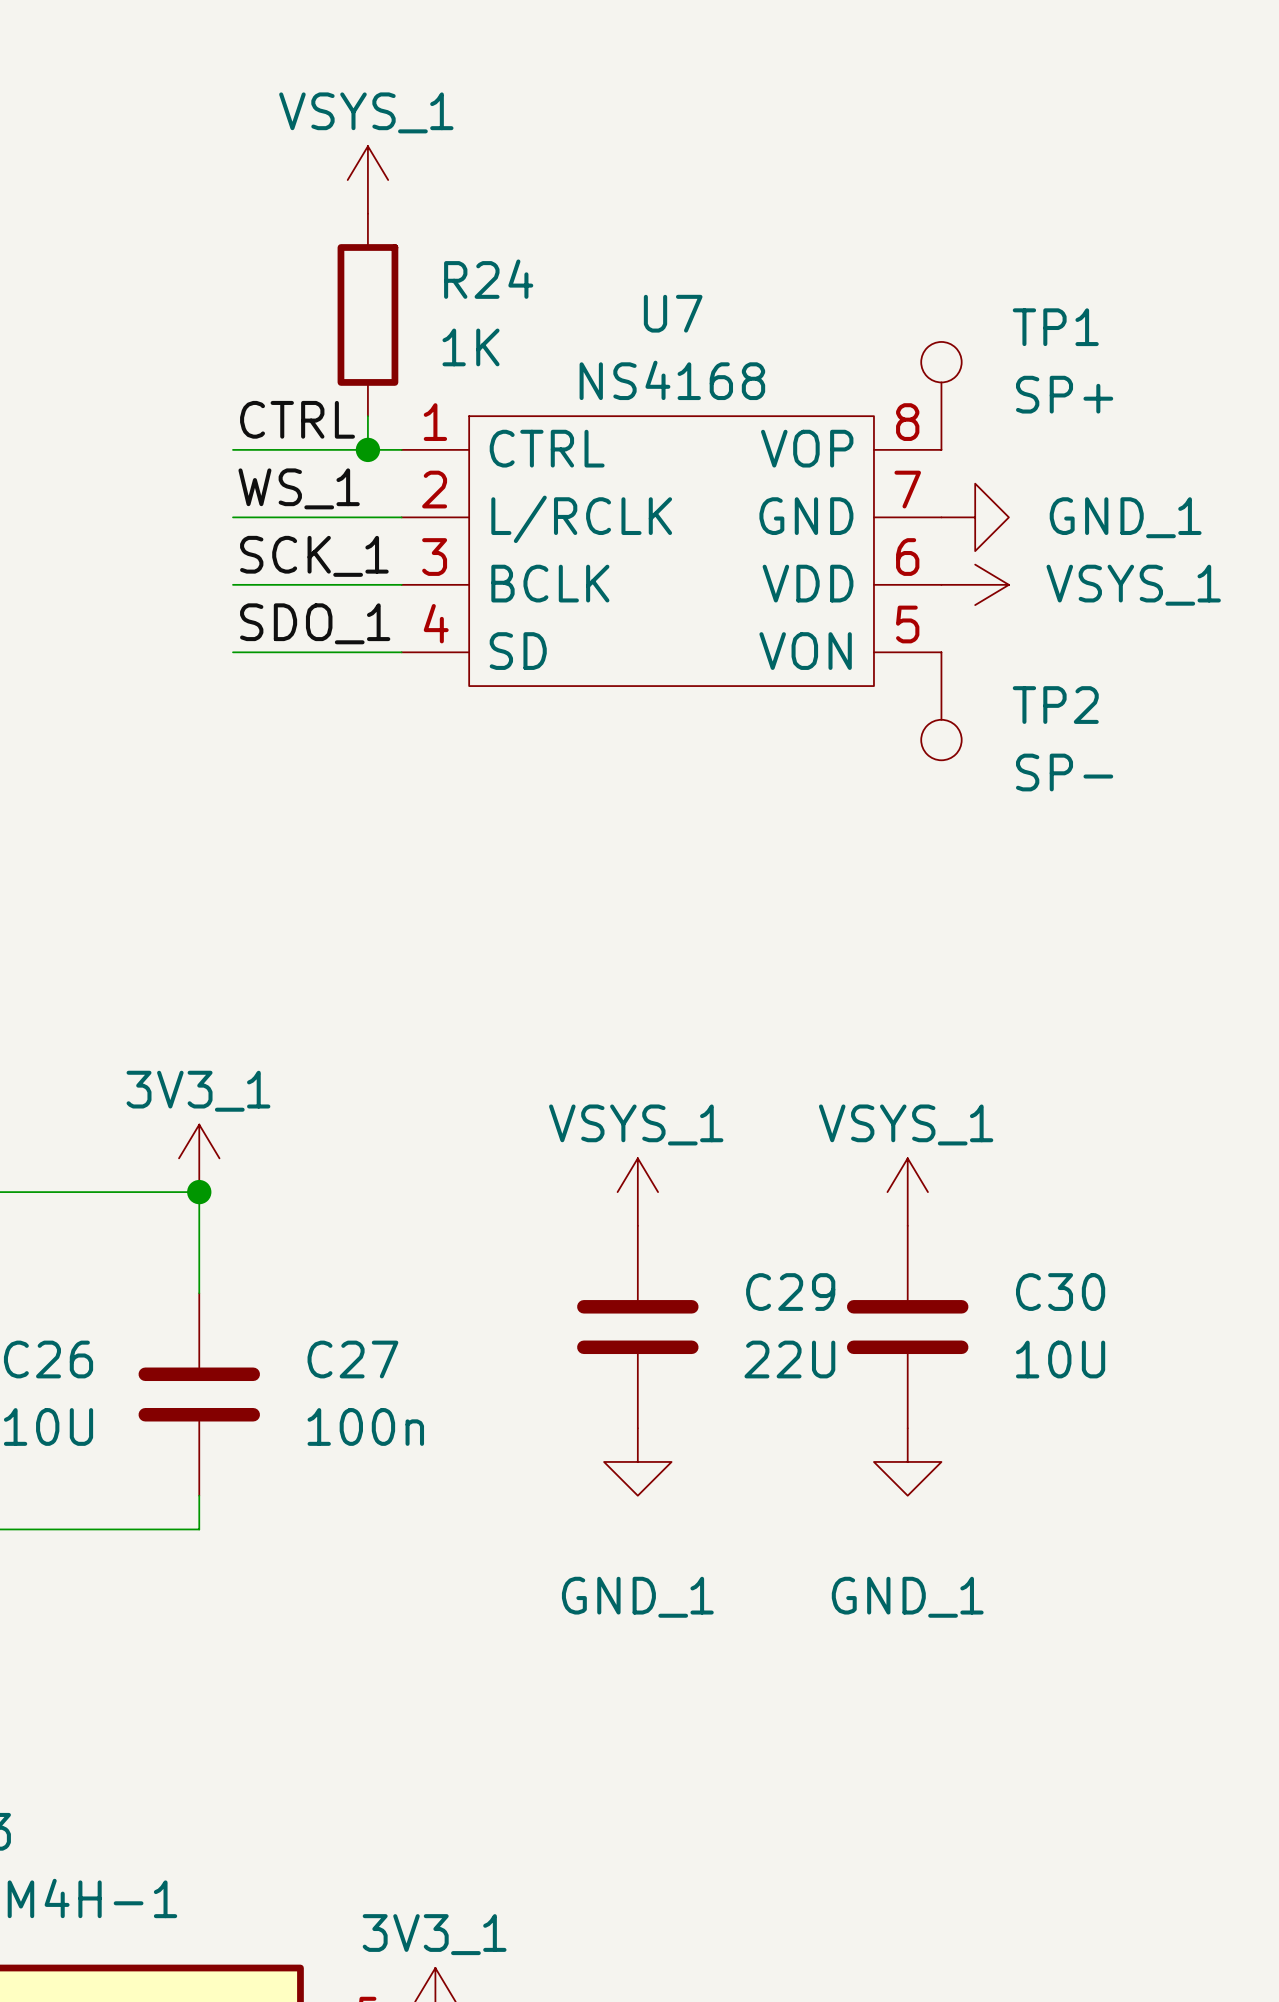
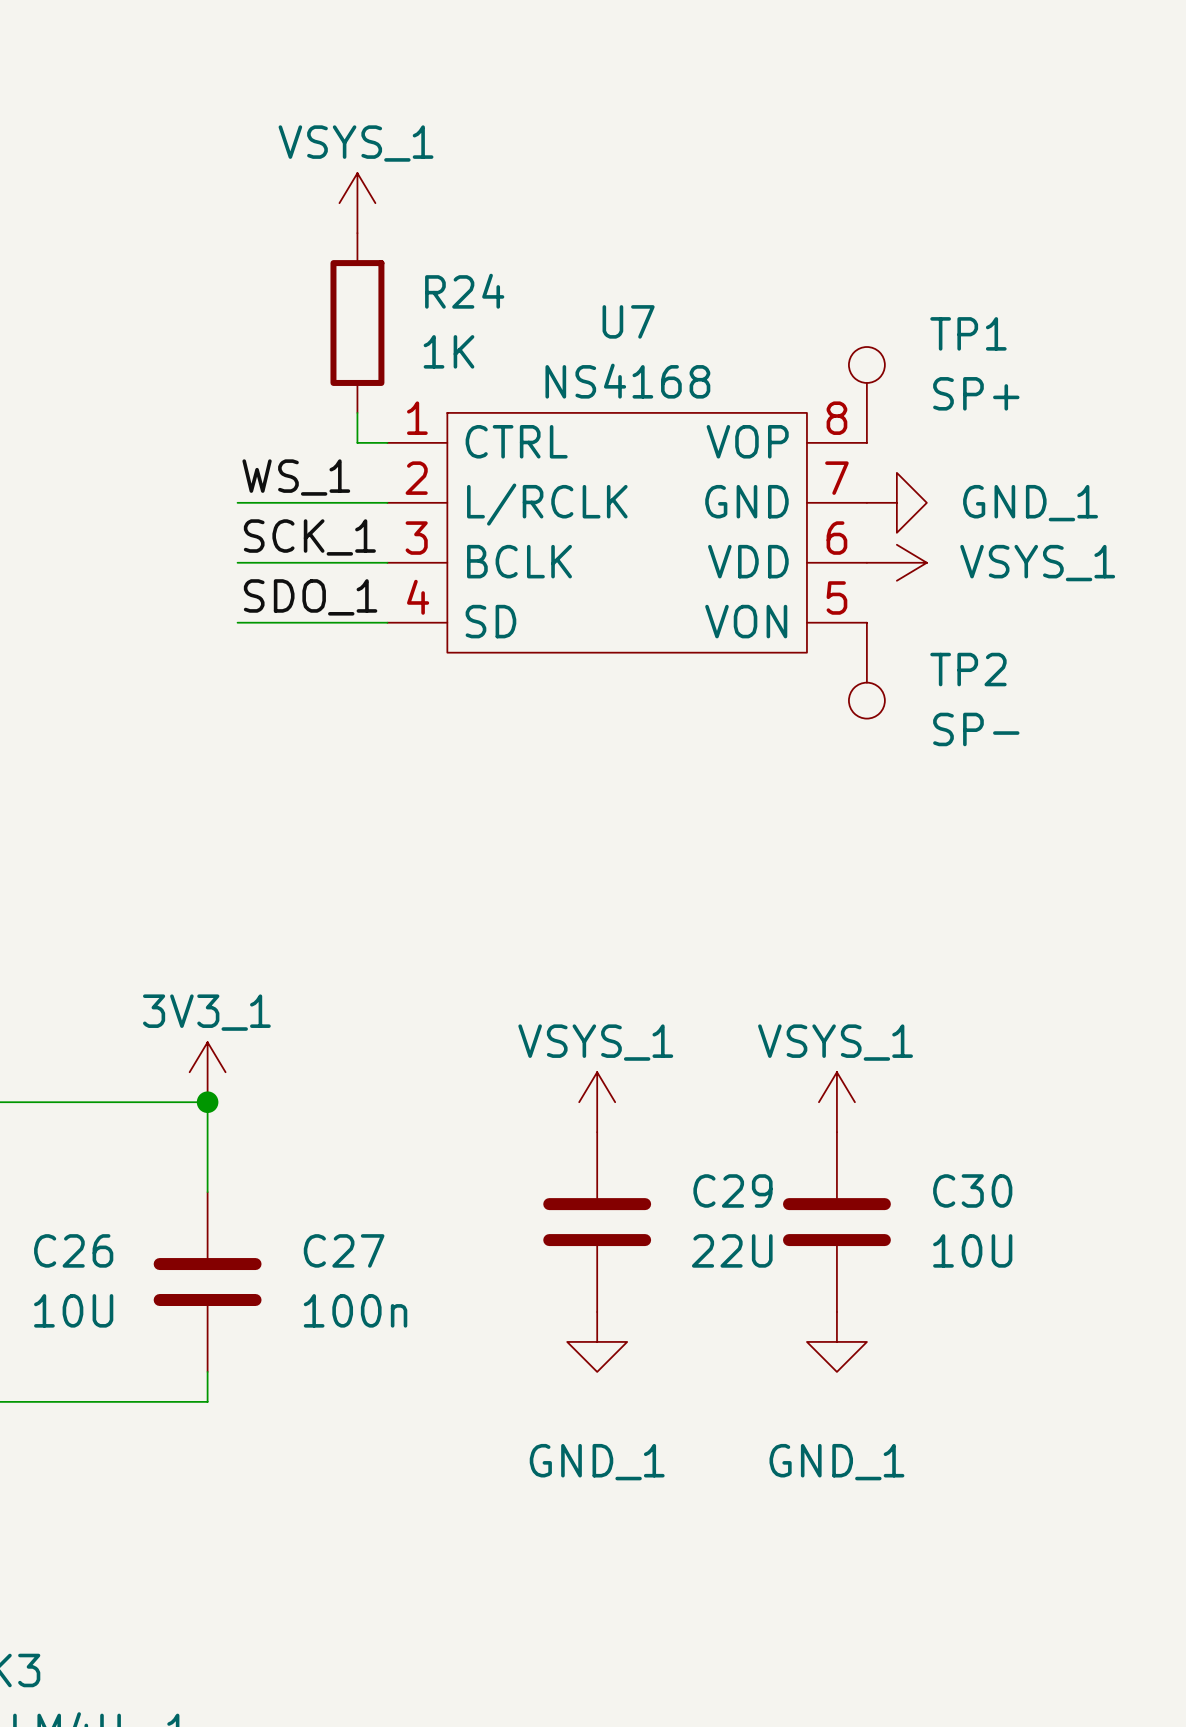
label: CTRL (297, 419) -> none
wire: (233, 449) (367, 449) -> none
junction: (367, 449) -> none

